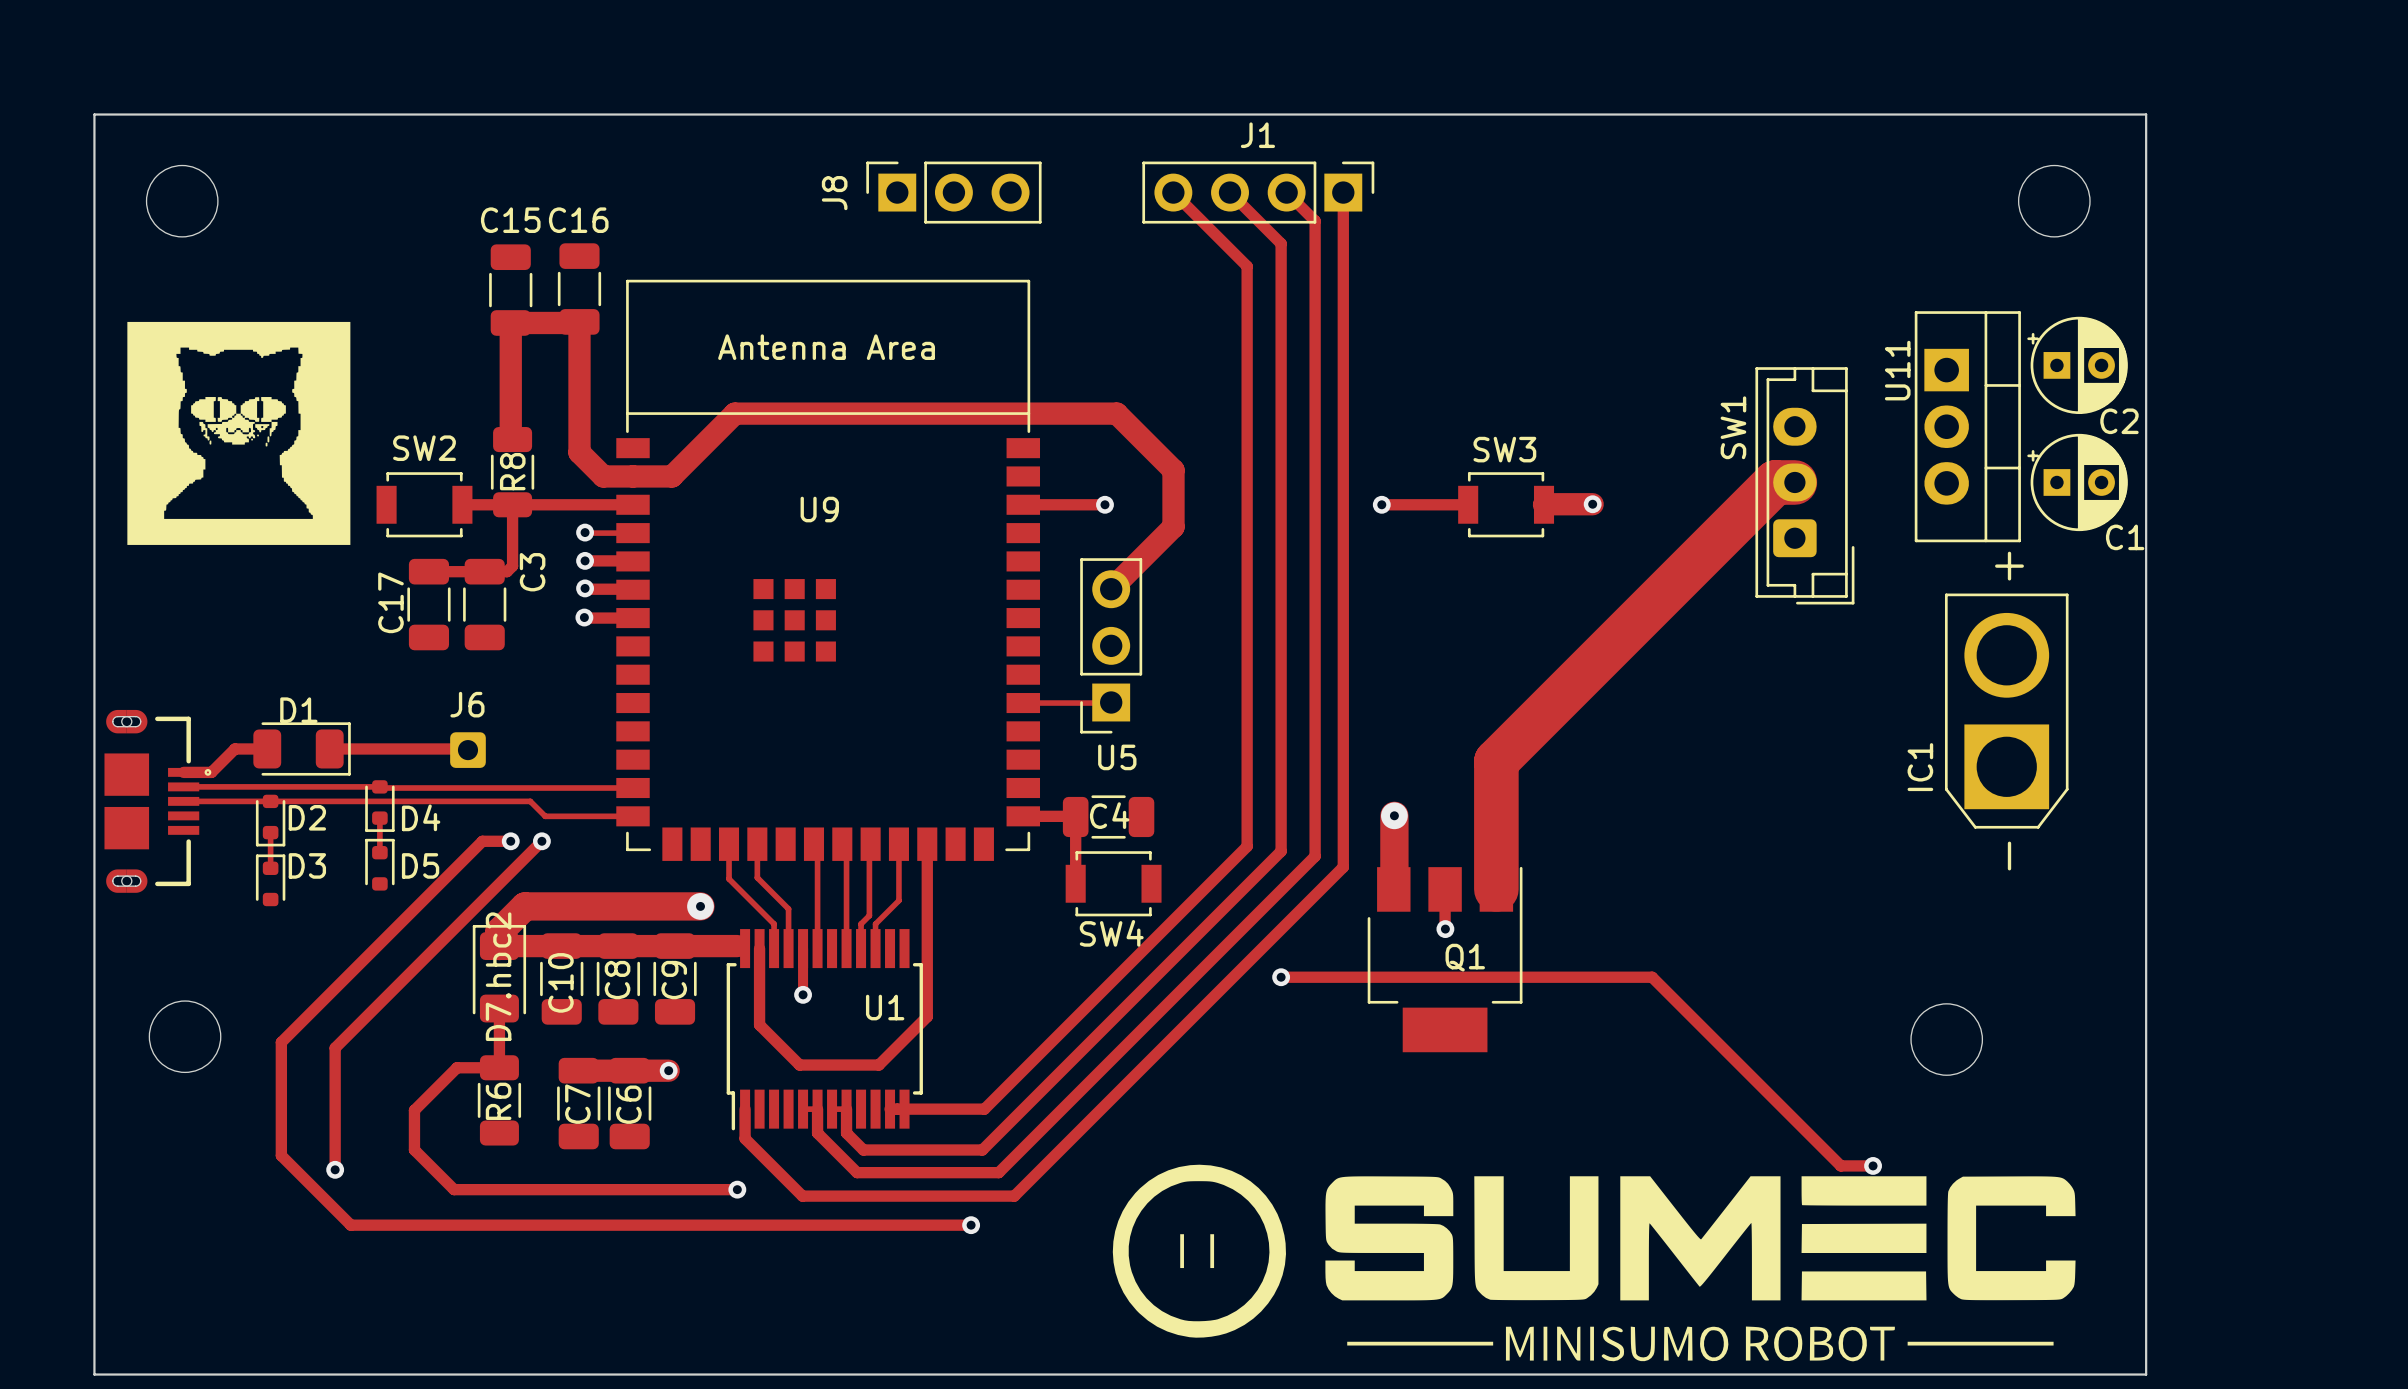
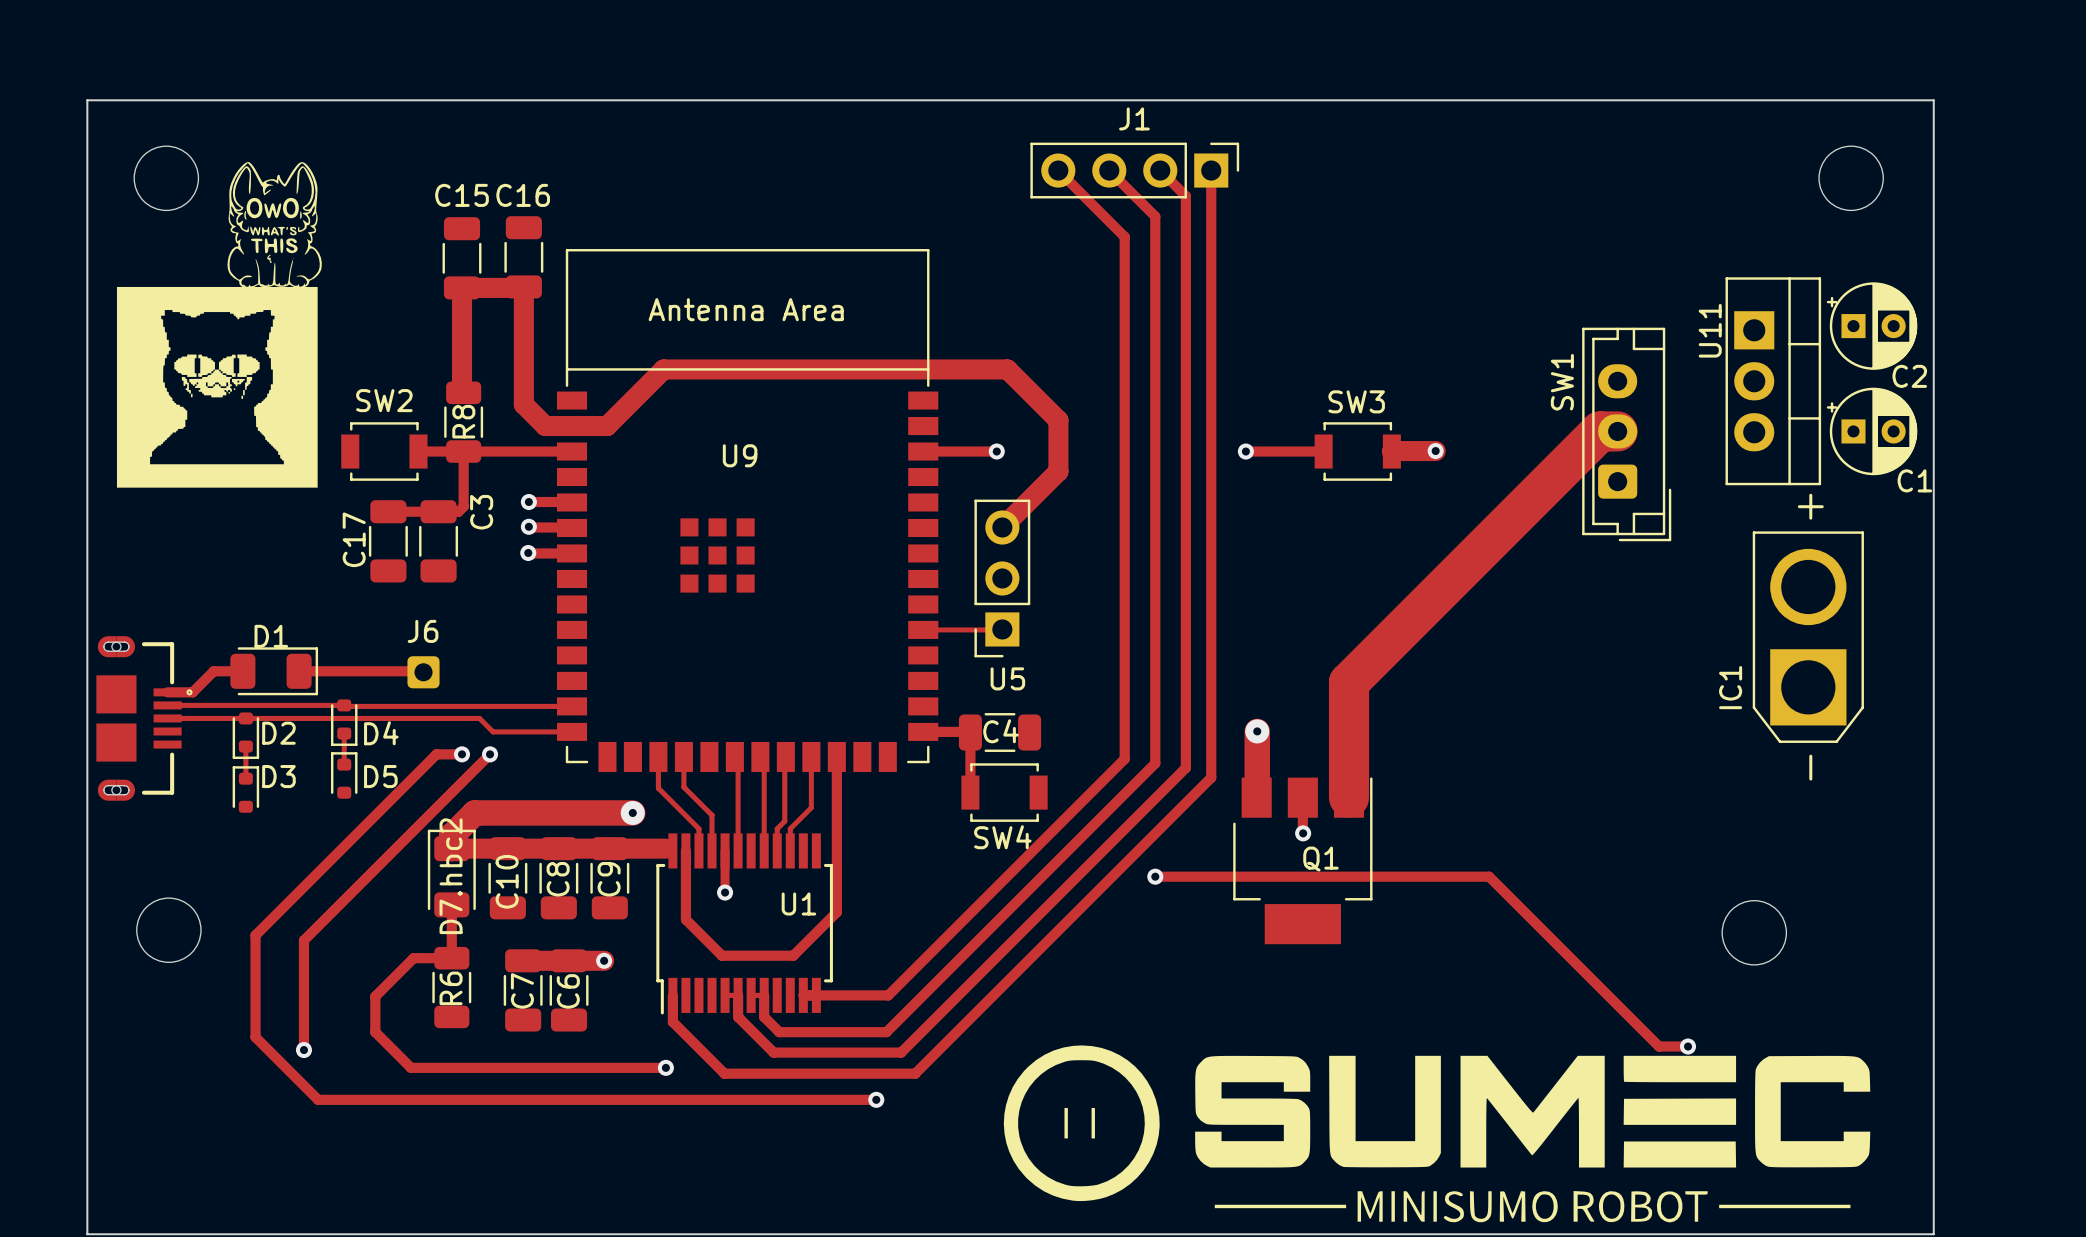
drawing: none -> [227, 162, 322, 289]
J8: (953, 192) -> none
track: (585, 532) (633, 533) -> none
via: (585, 532) -> none

